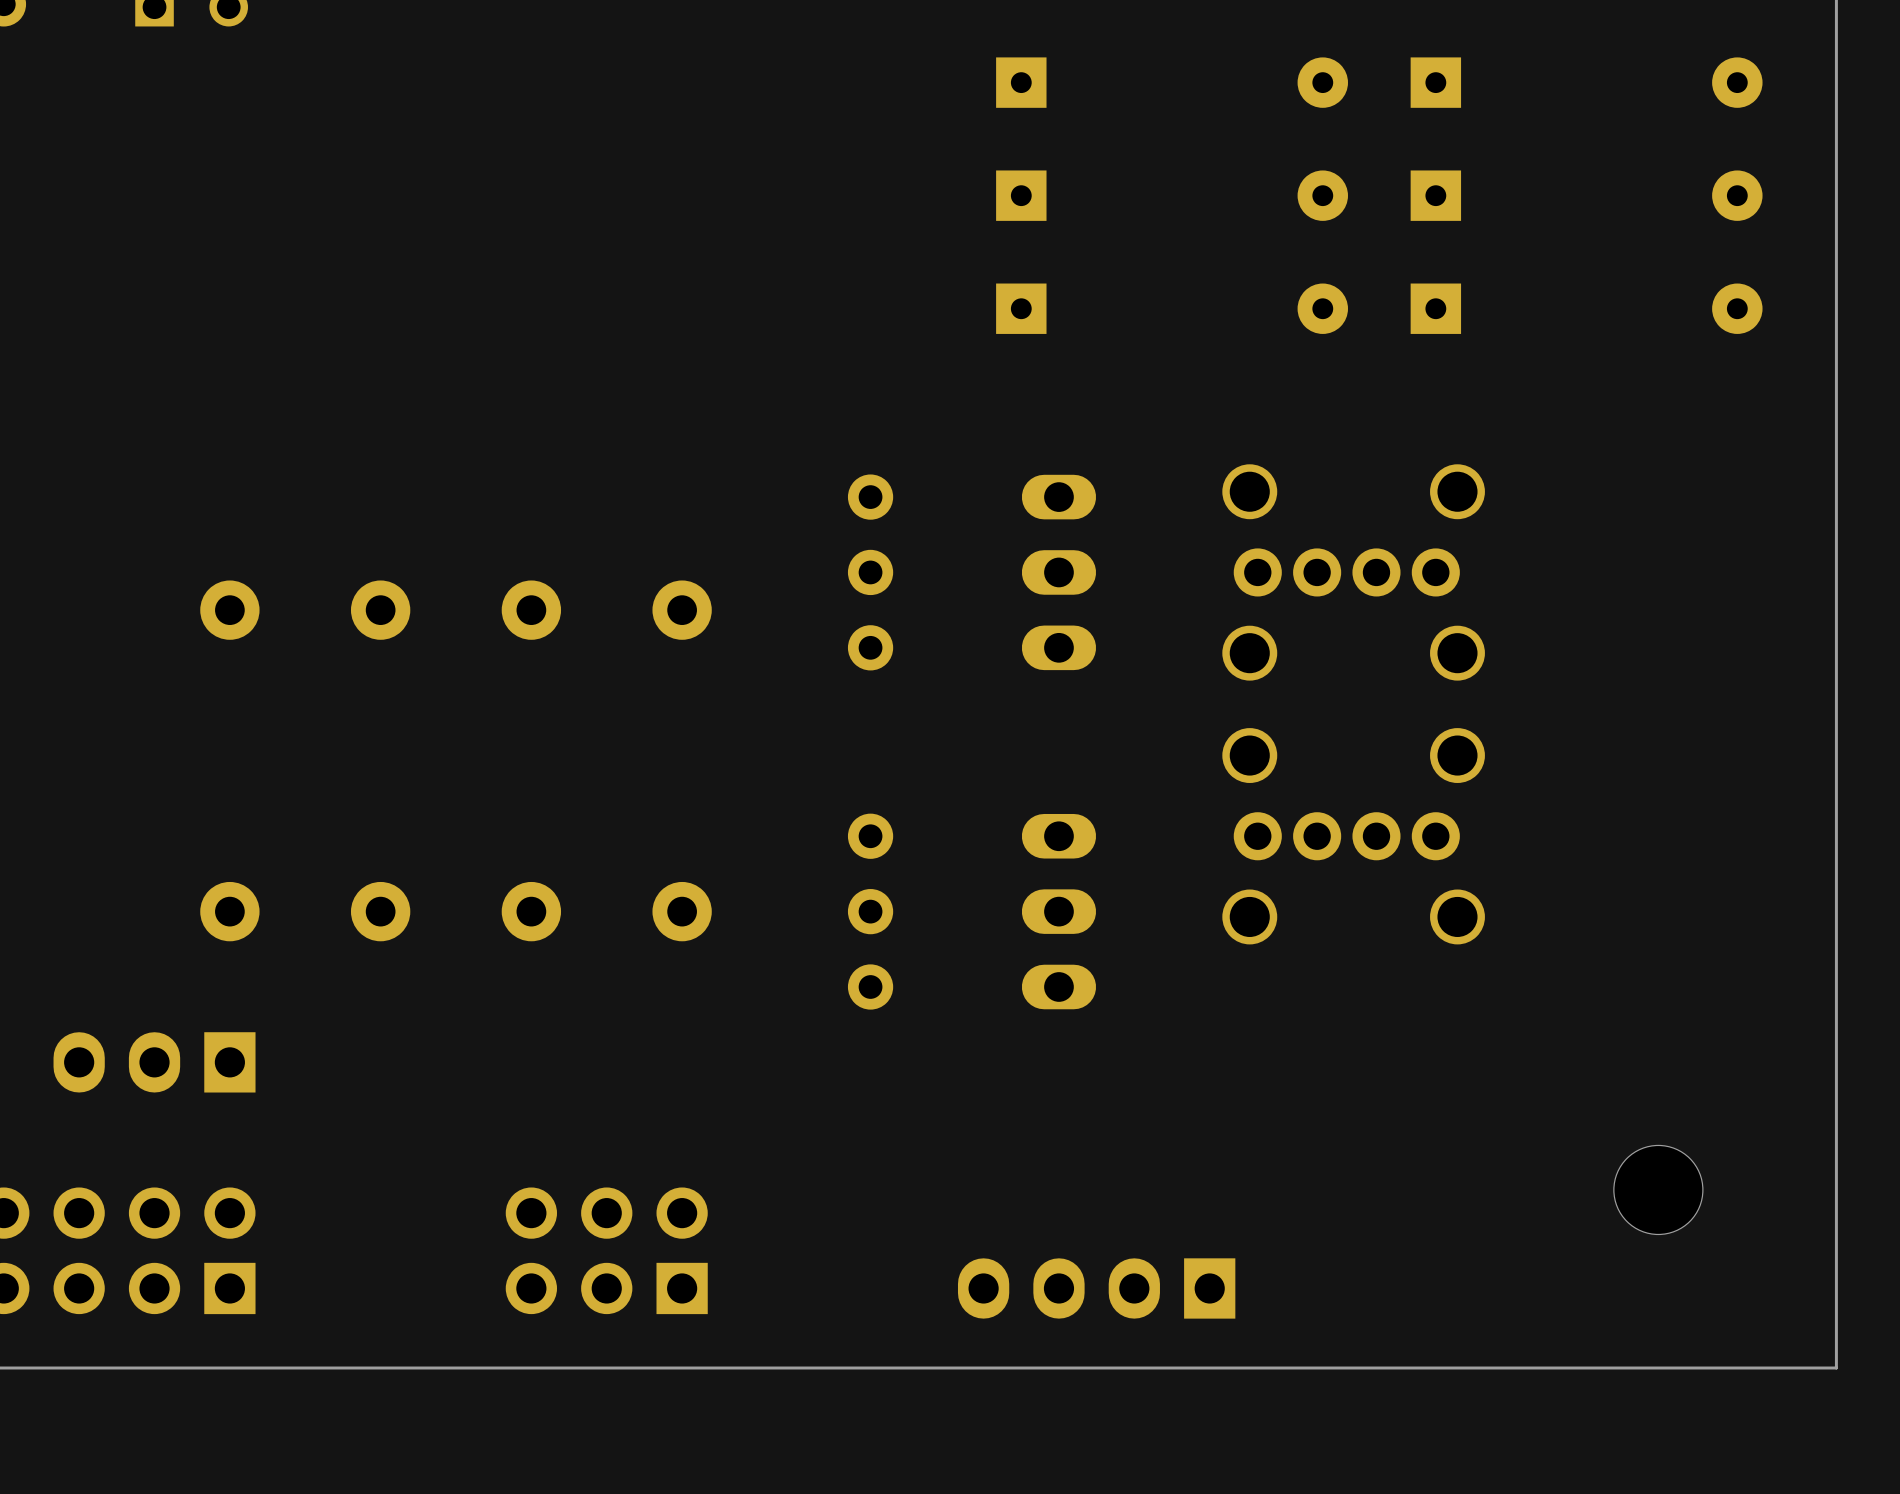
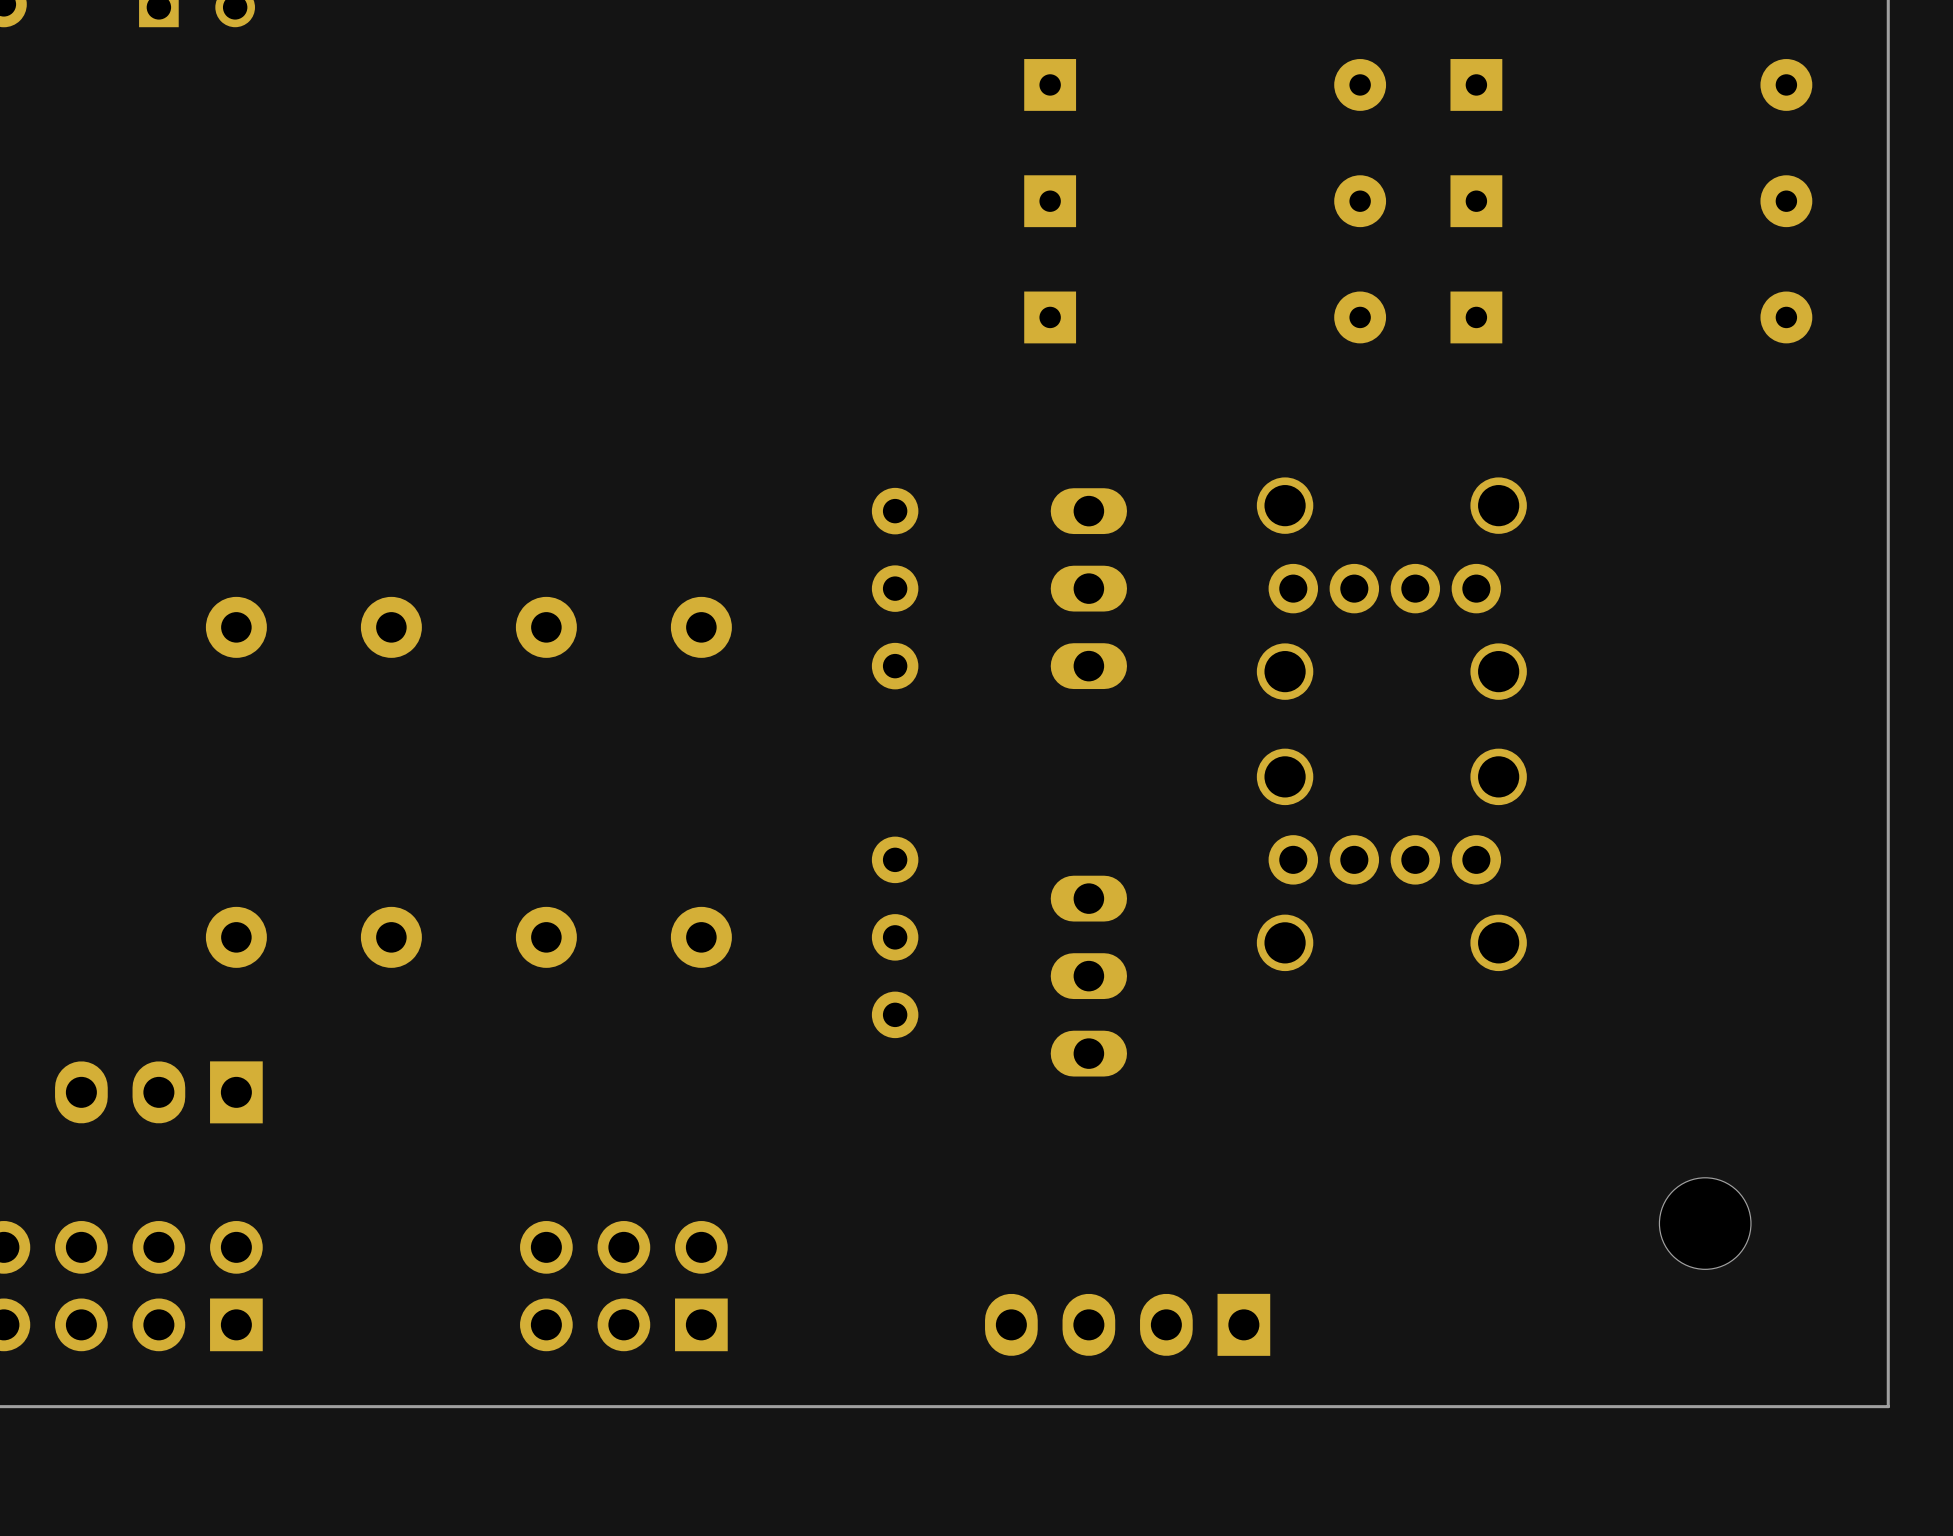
part position: (1058, 911) -> (1088, 976)

